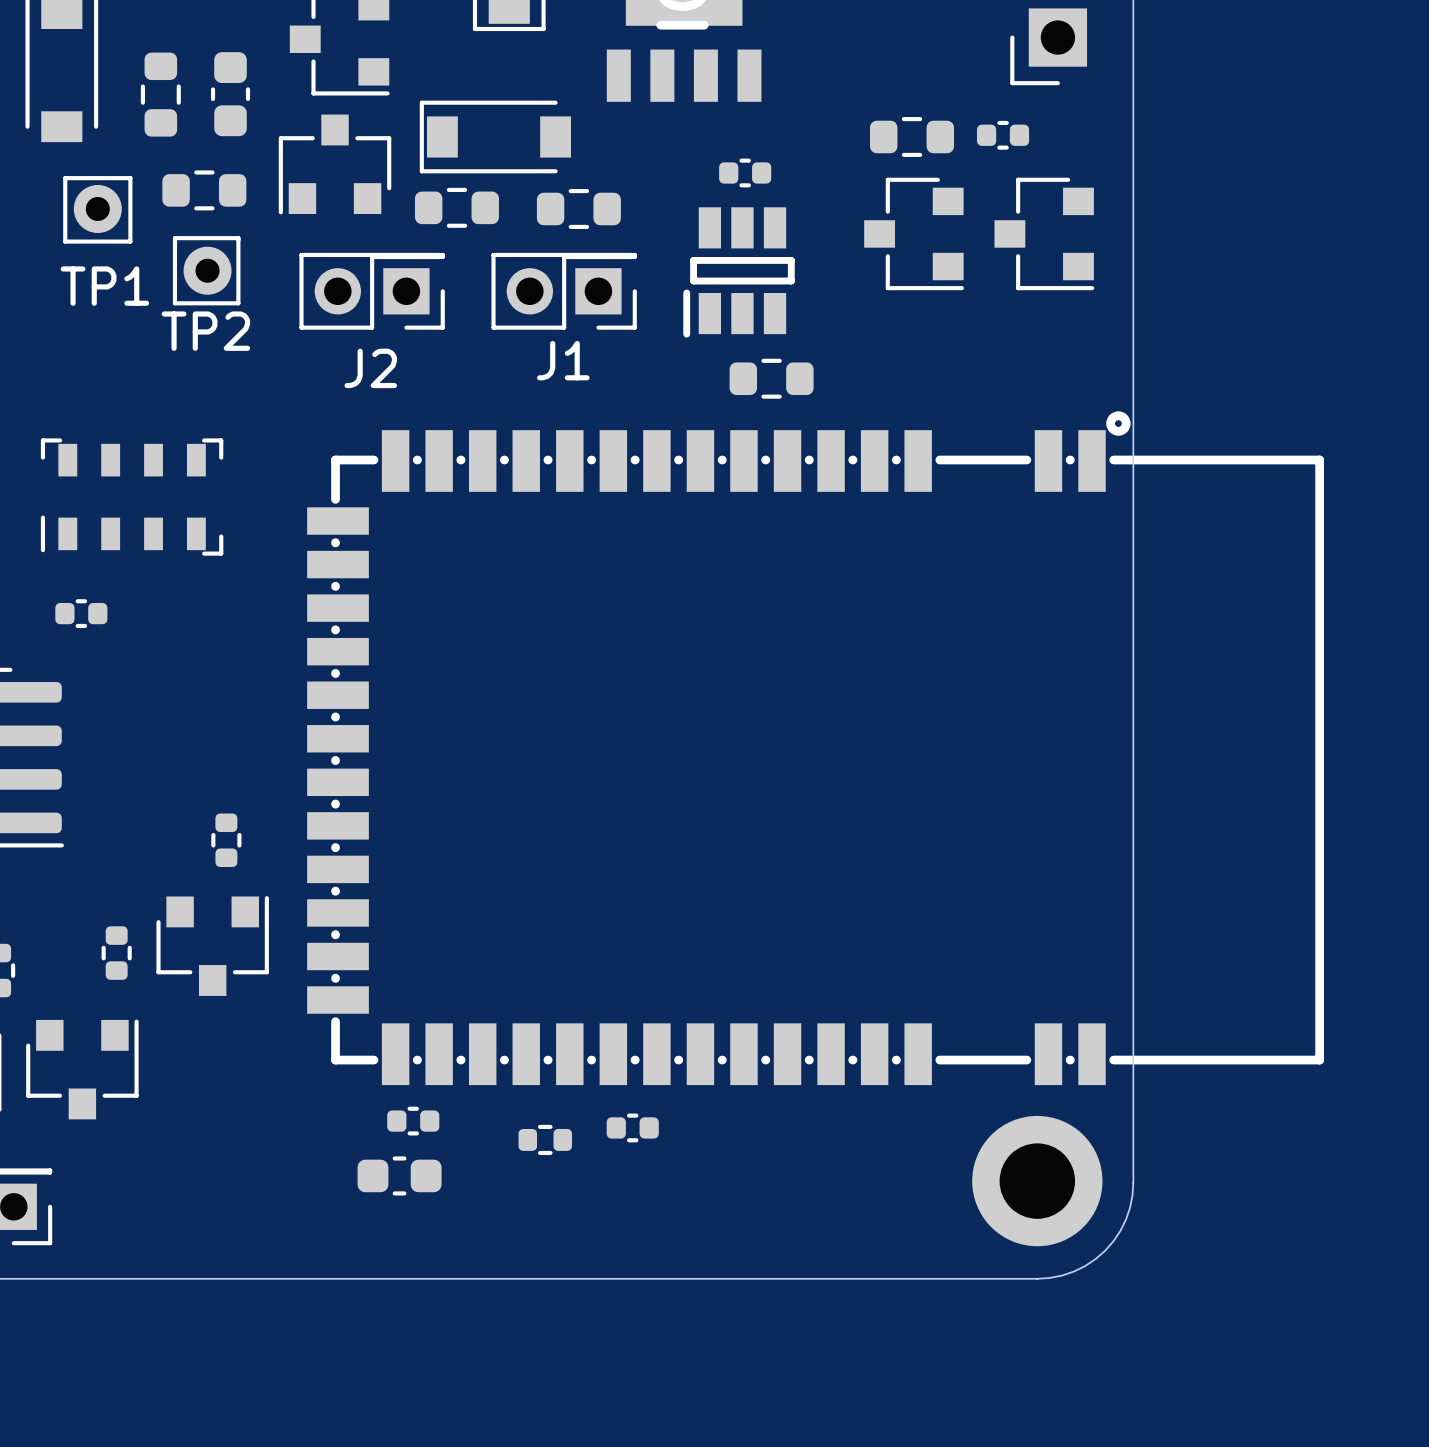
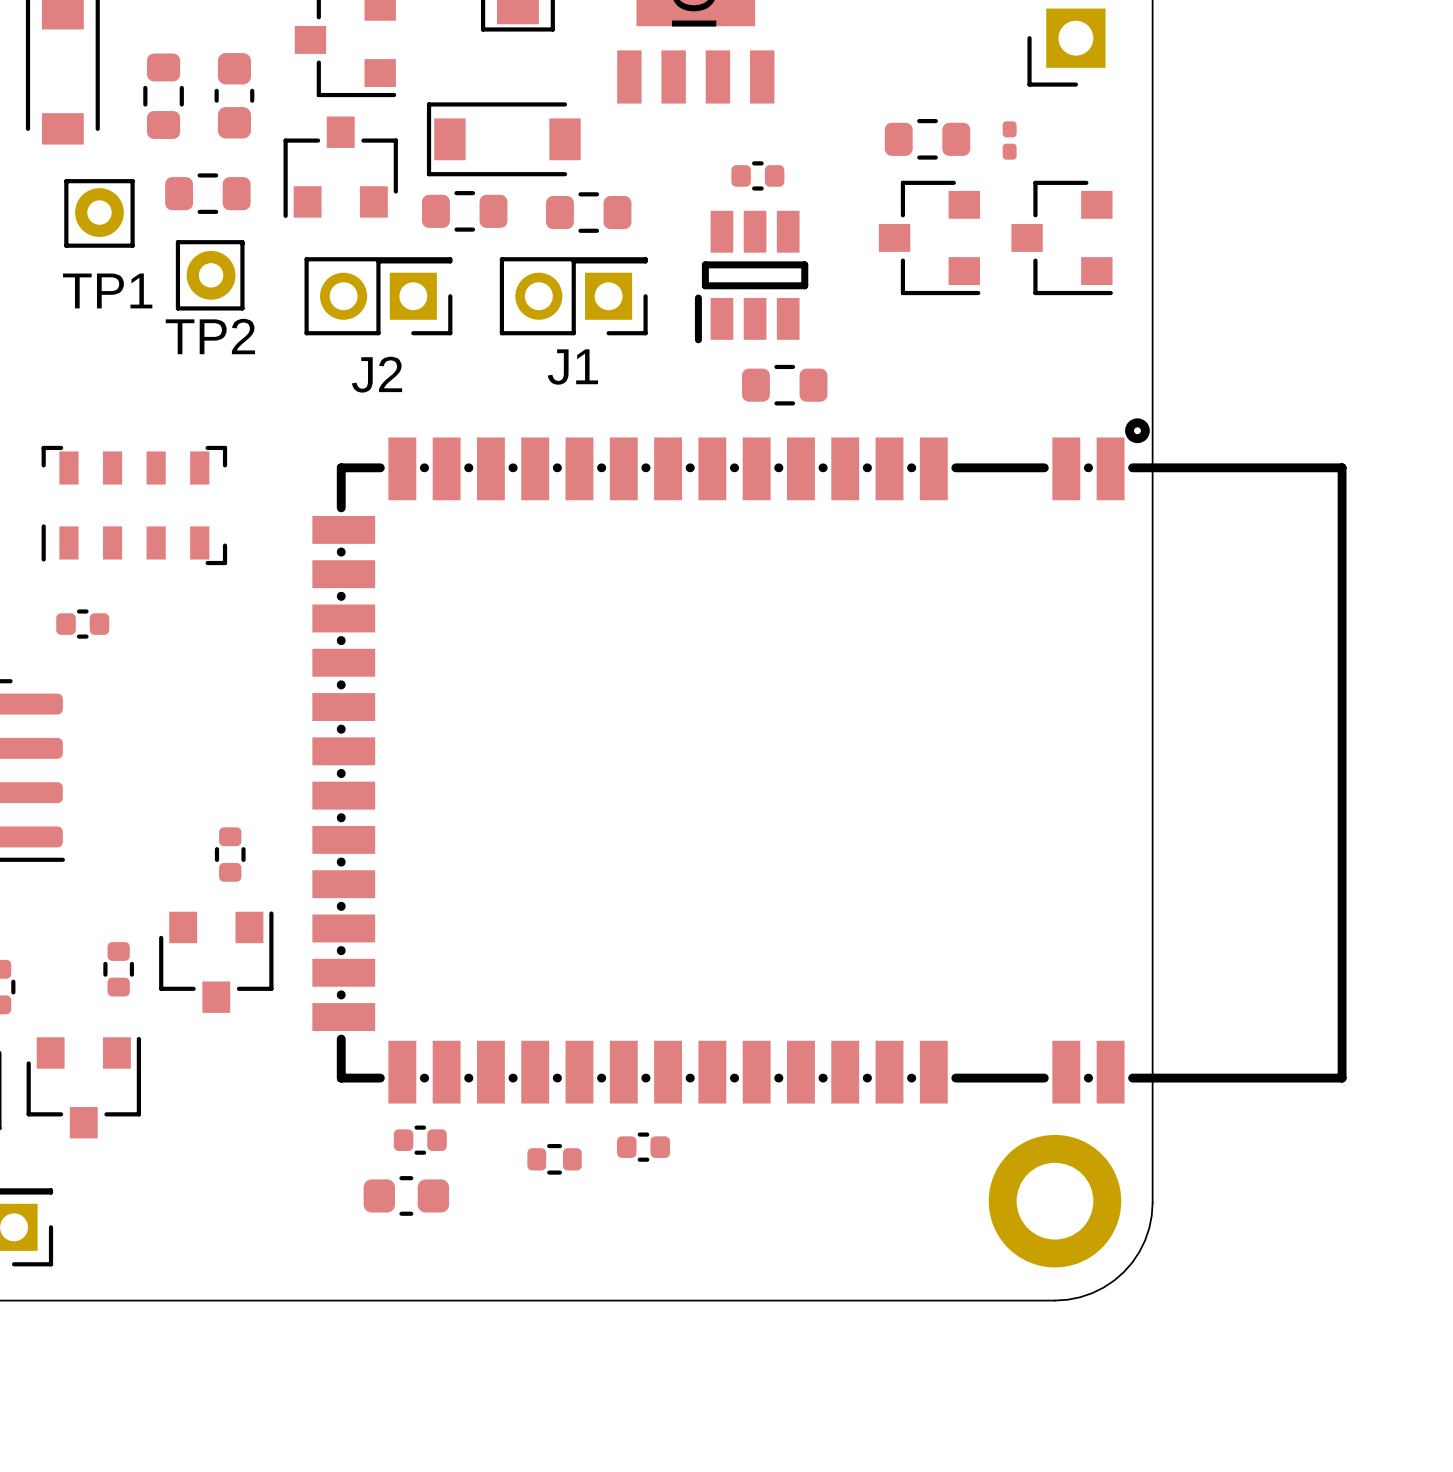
part footprint: [976, 120, 1030, 150] -> [1002, 121, 1017, 160]

